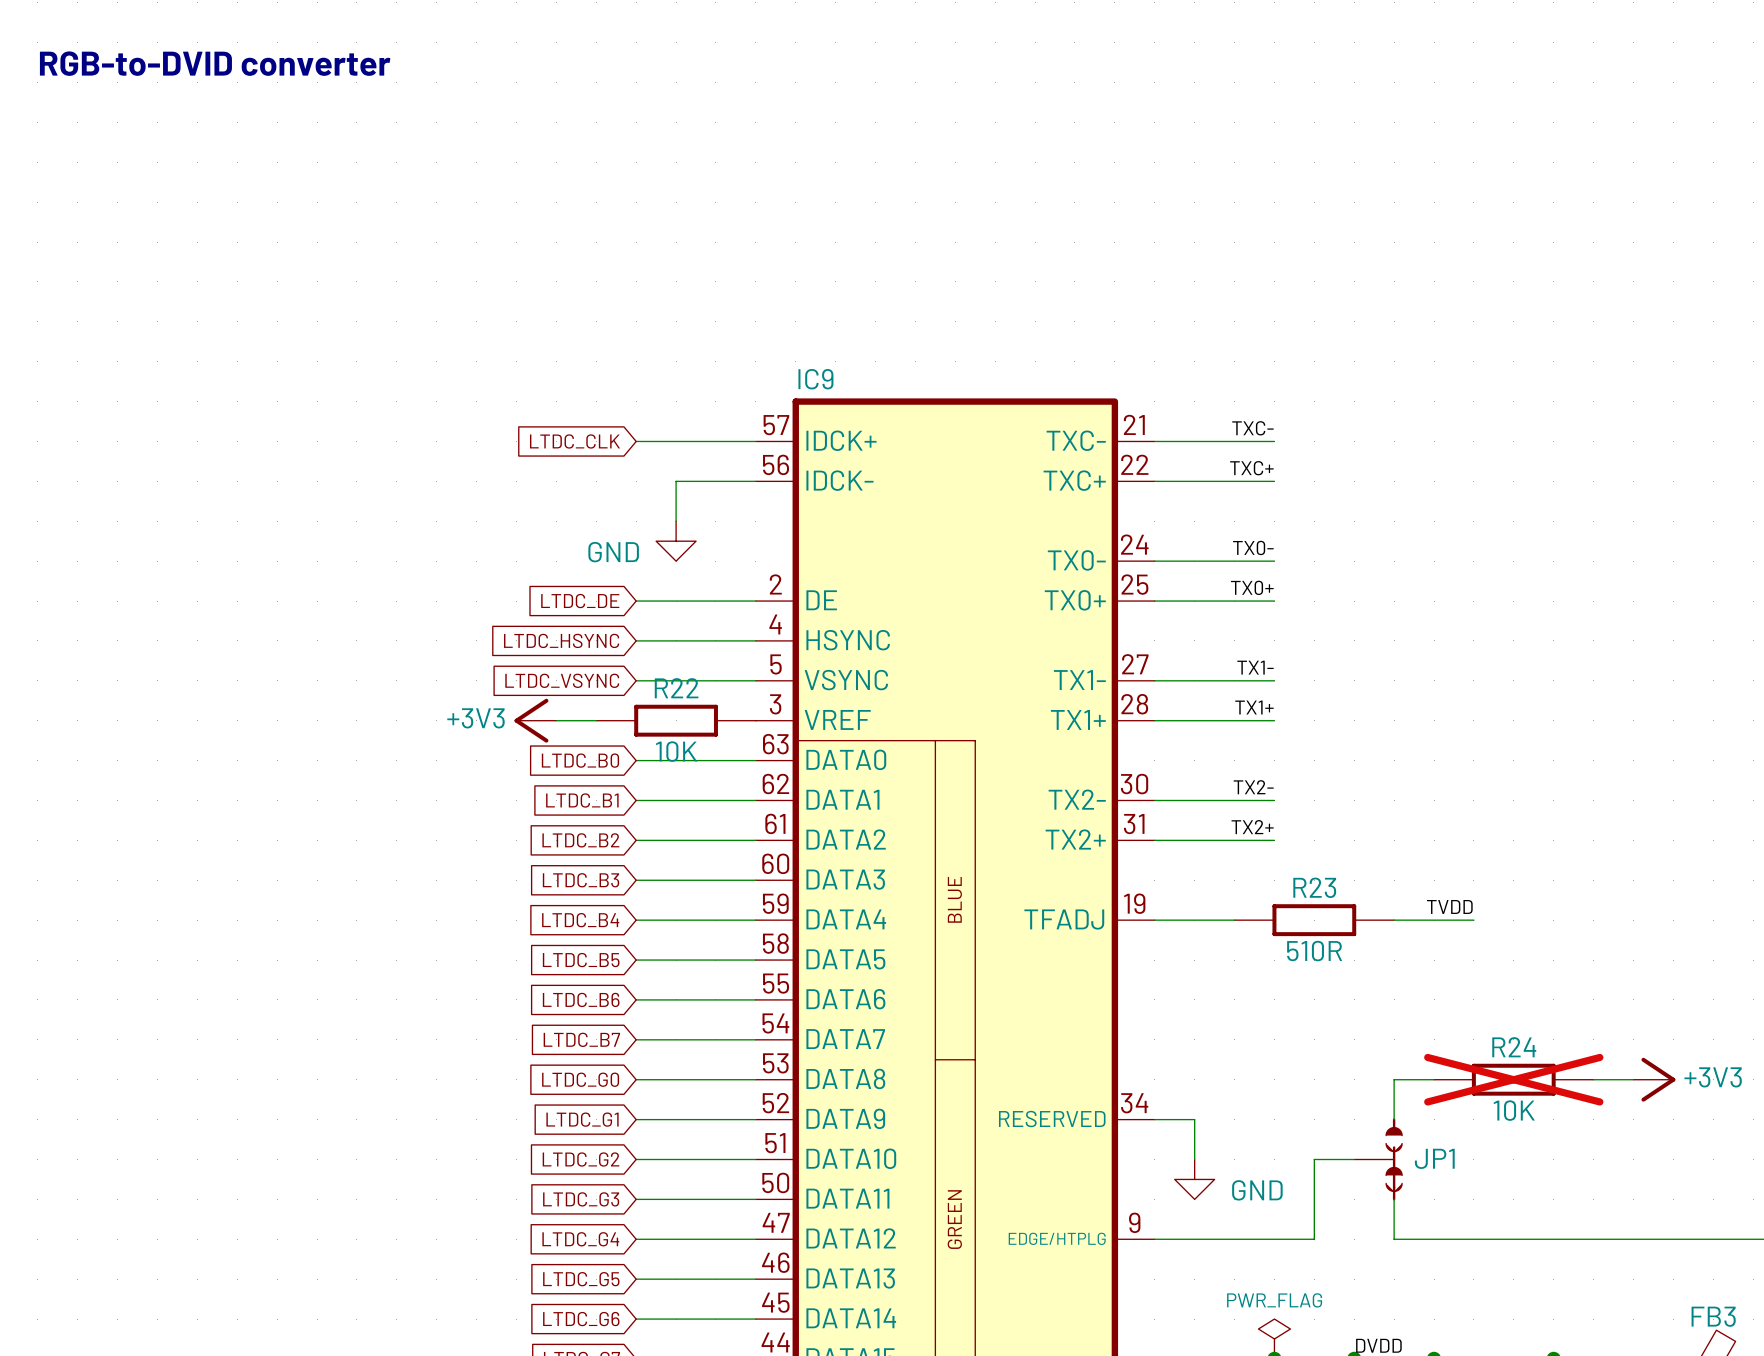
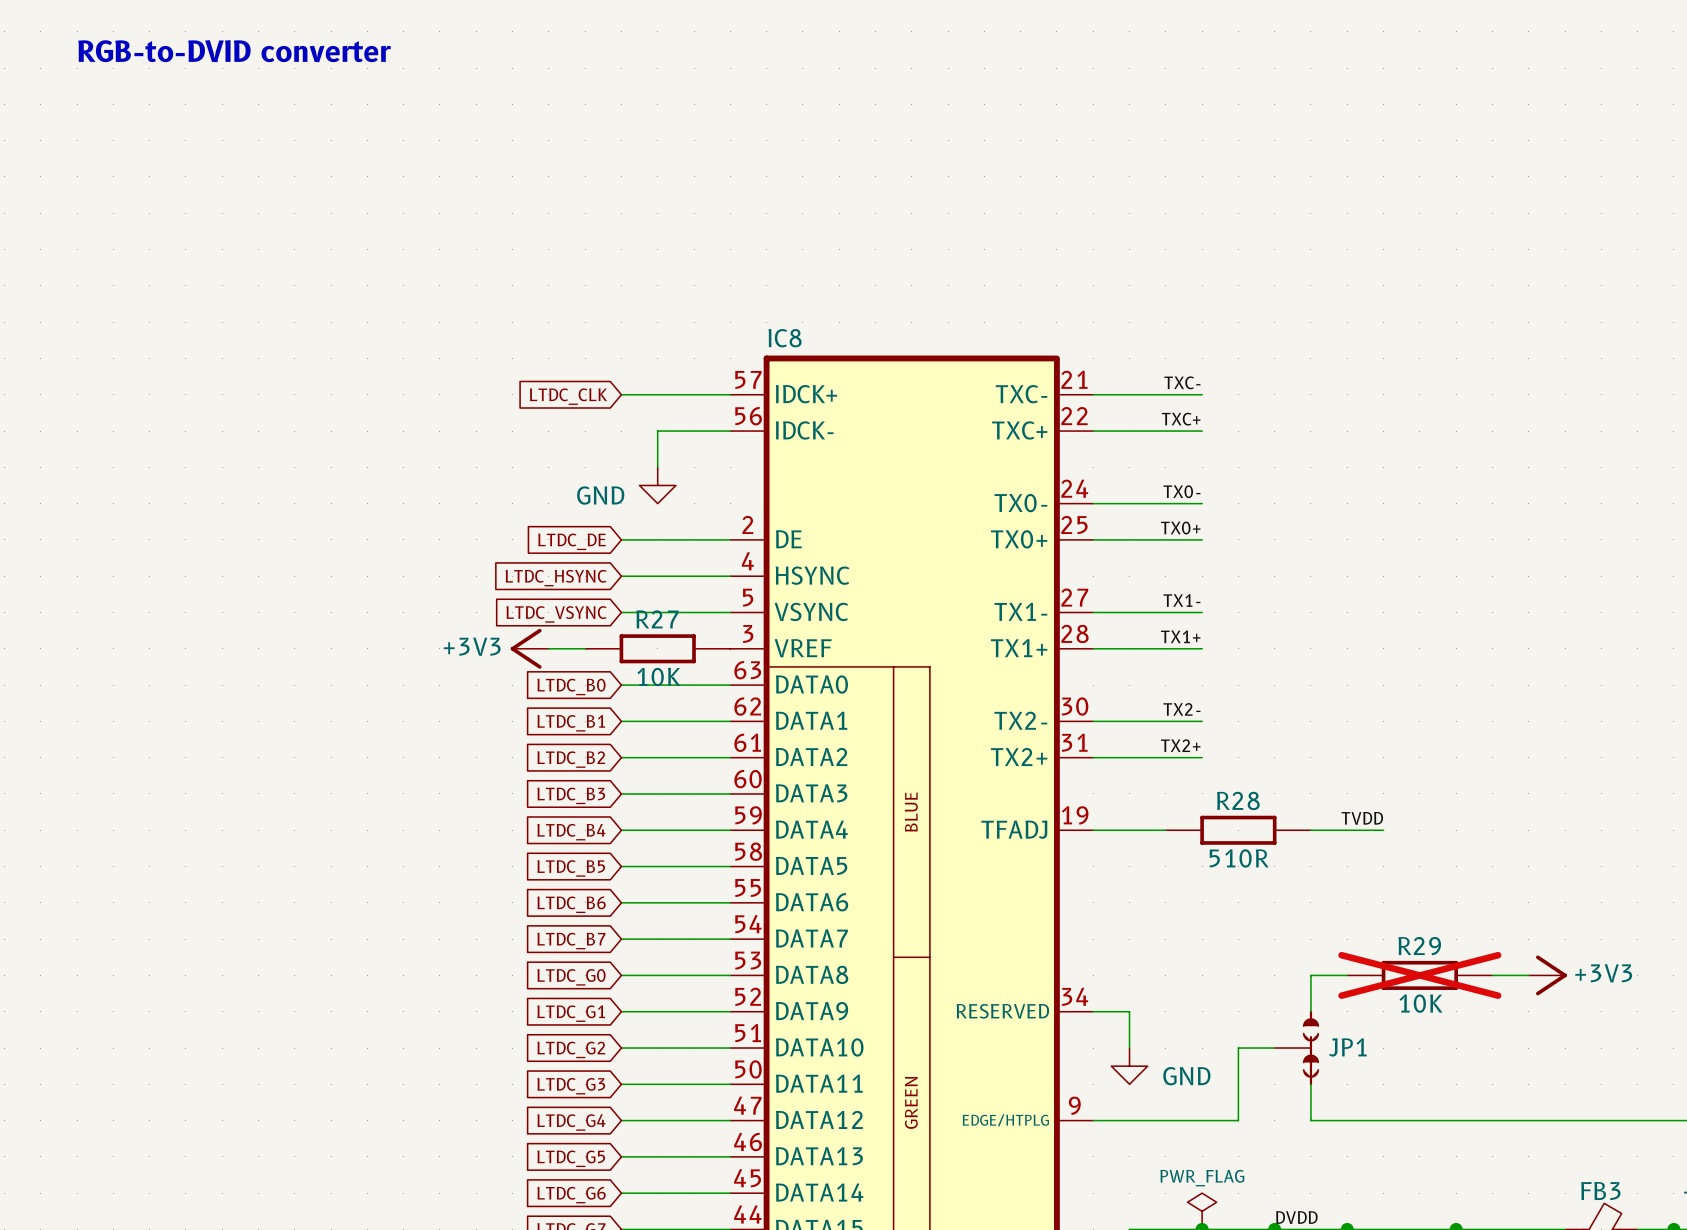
IC9 name: IC9 (815, 379) -> IC8 (785, 338)
R22 name: R22 (676, 688) -> R27 (657, 619)
R23 name: R23 (1314, 887) -> R28 (1238, 800)
R24 name: R24 (1514, 1047) -> R29 (1419, 946)

